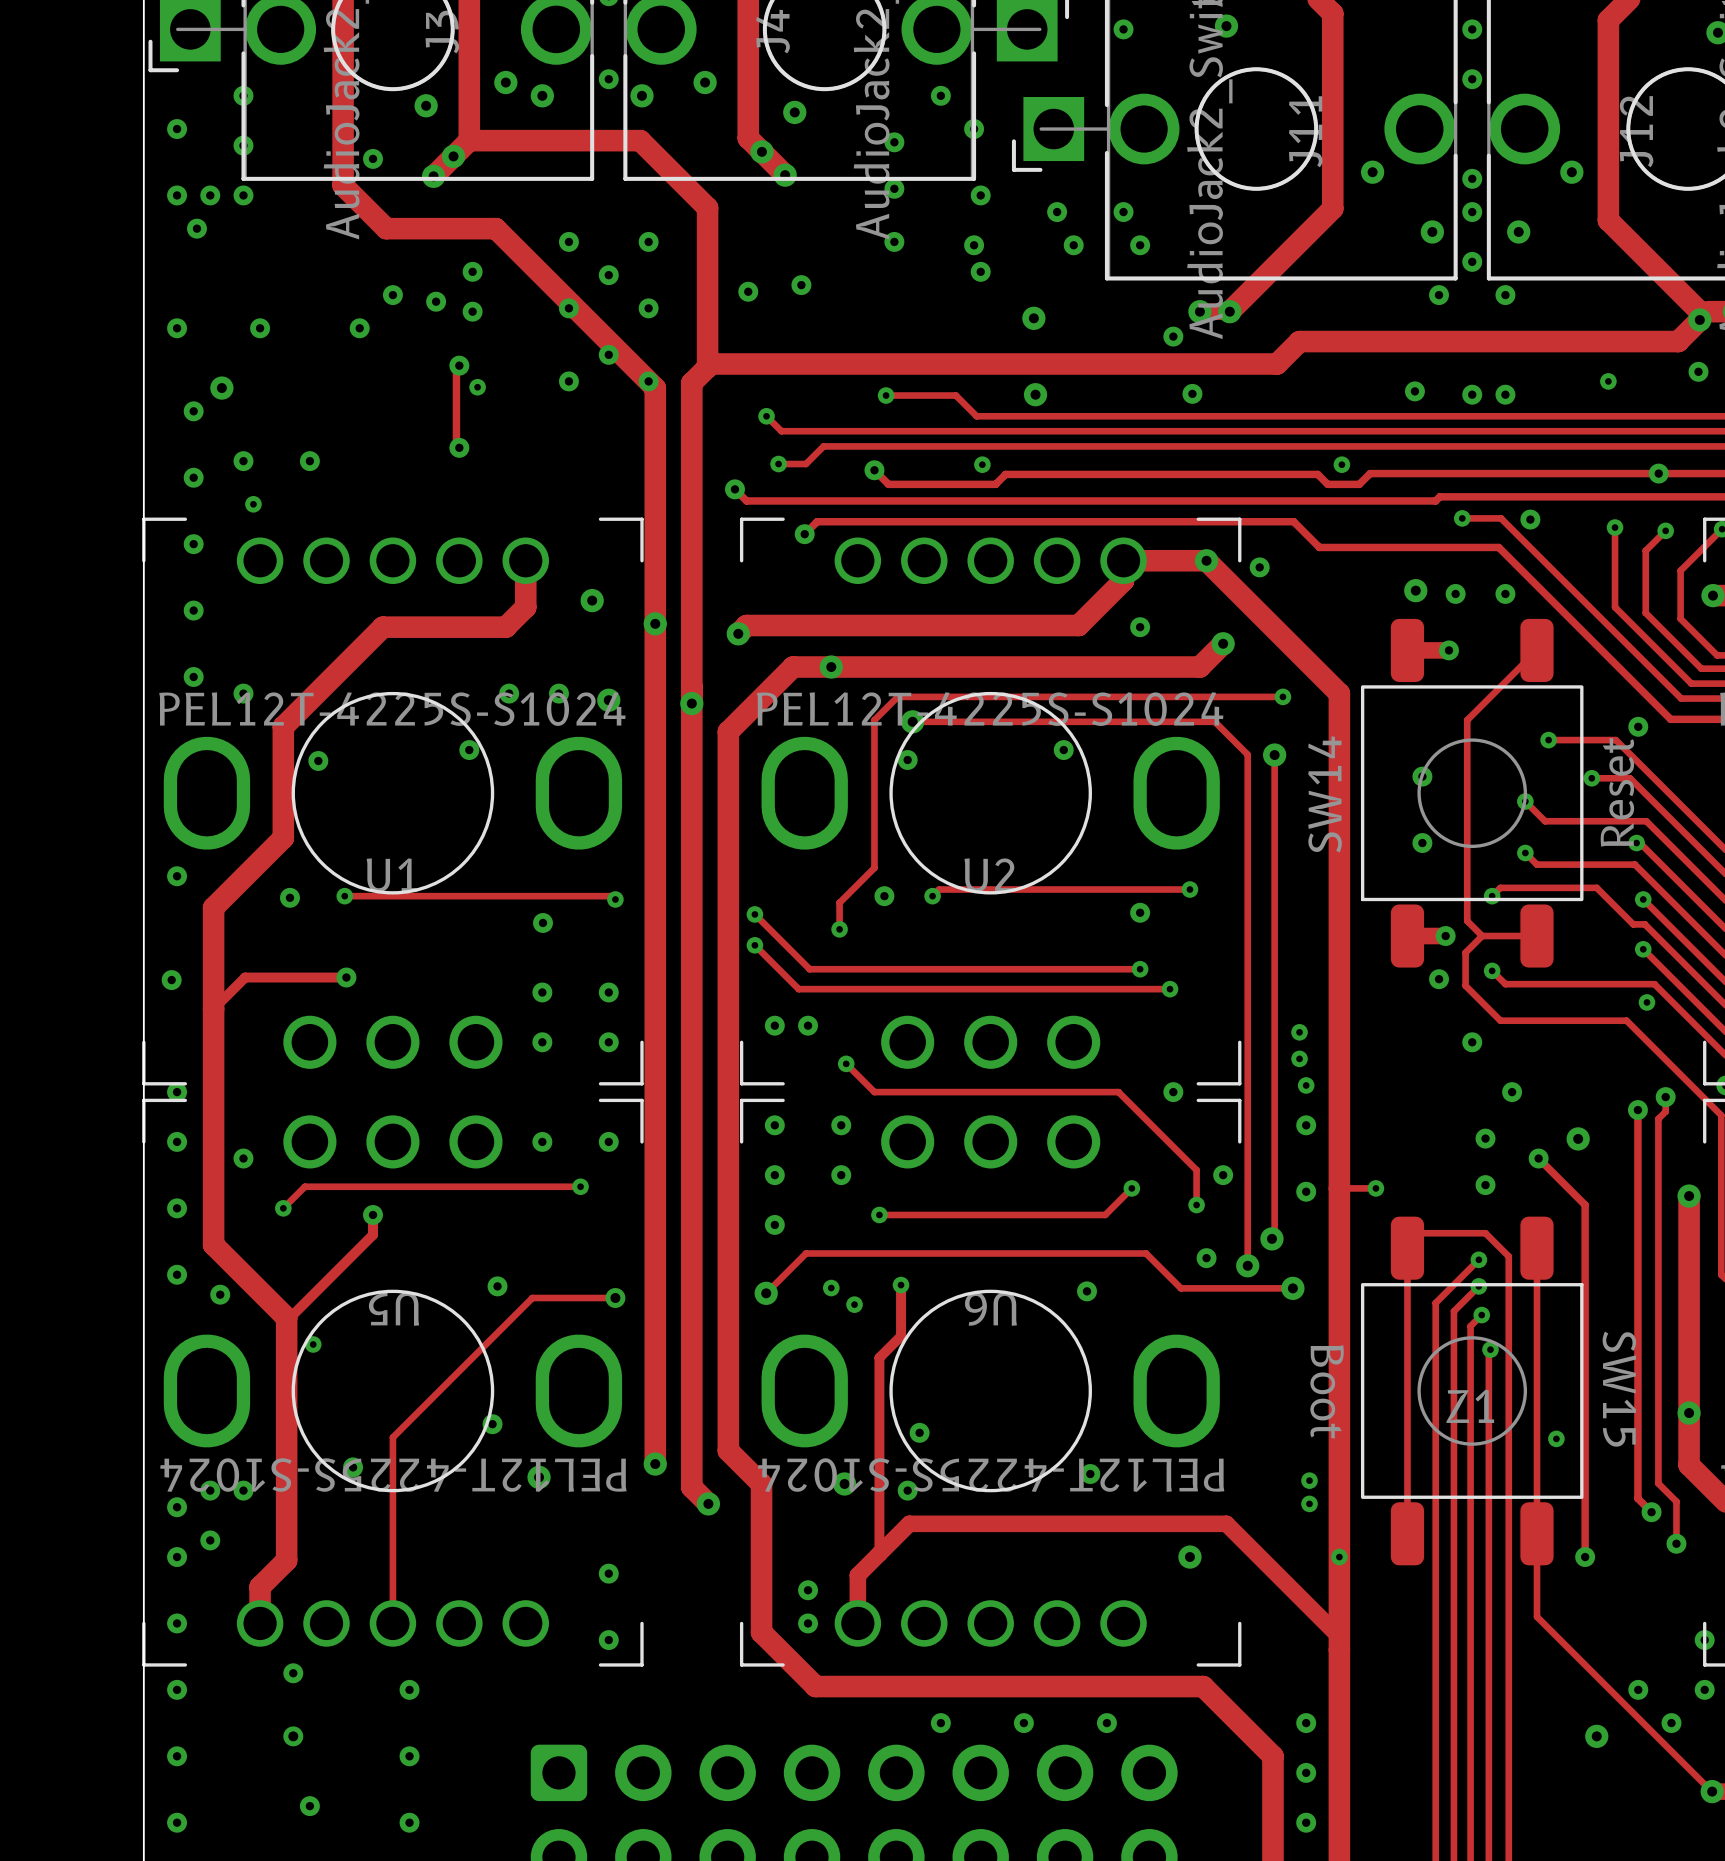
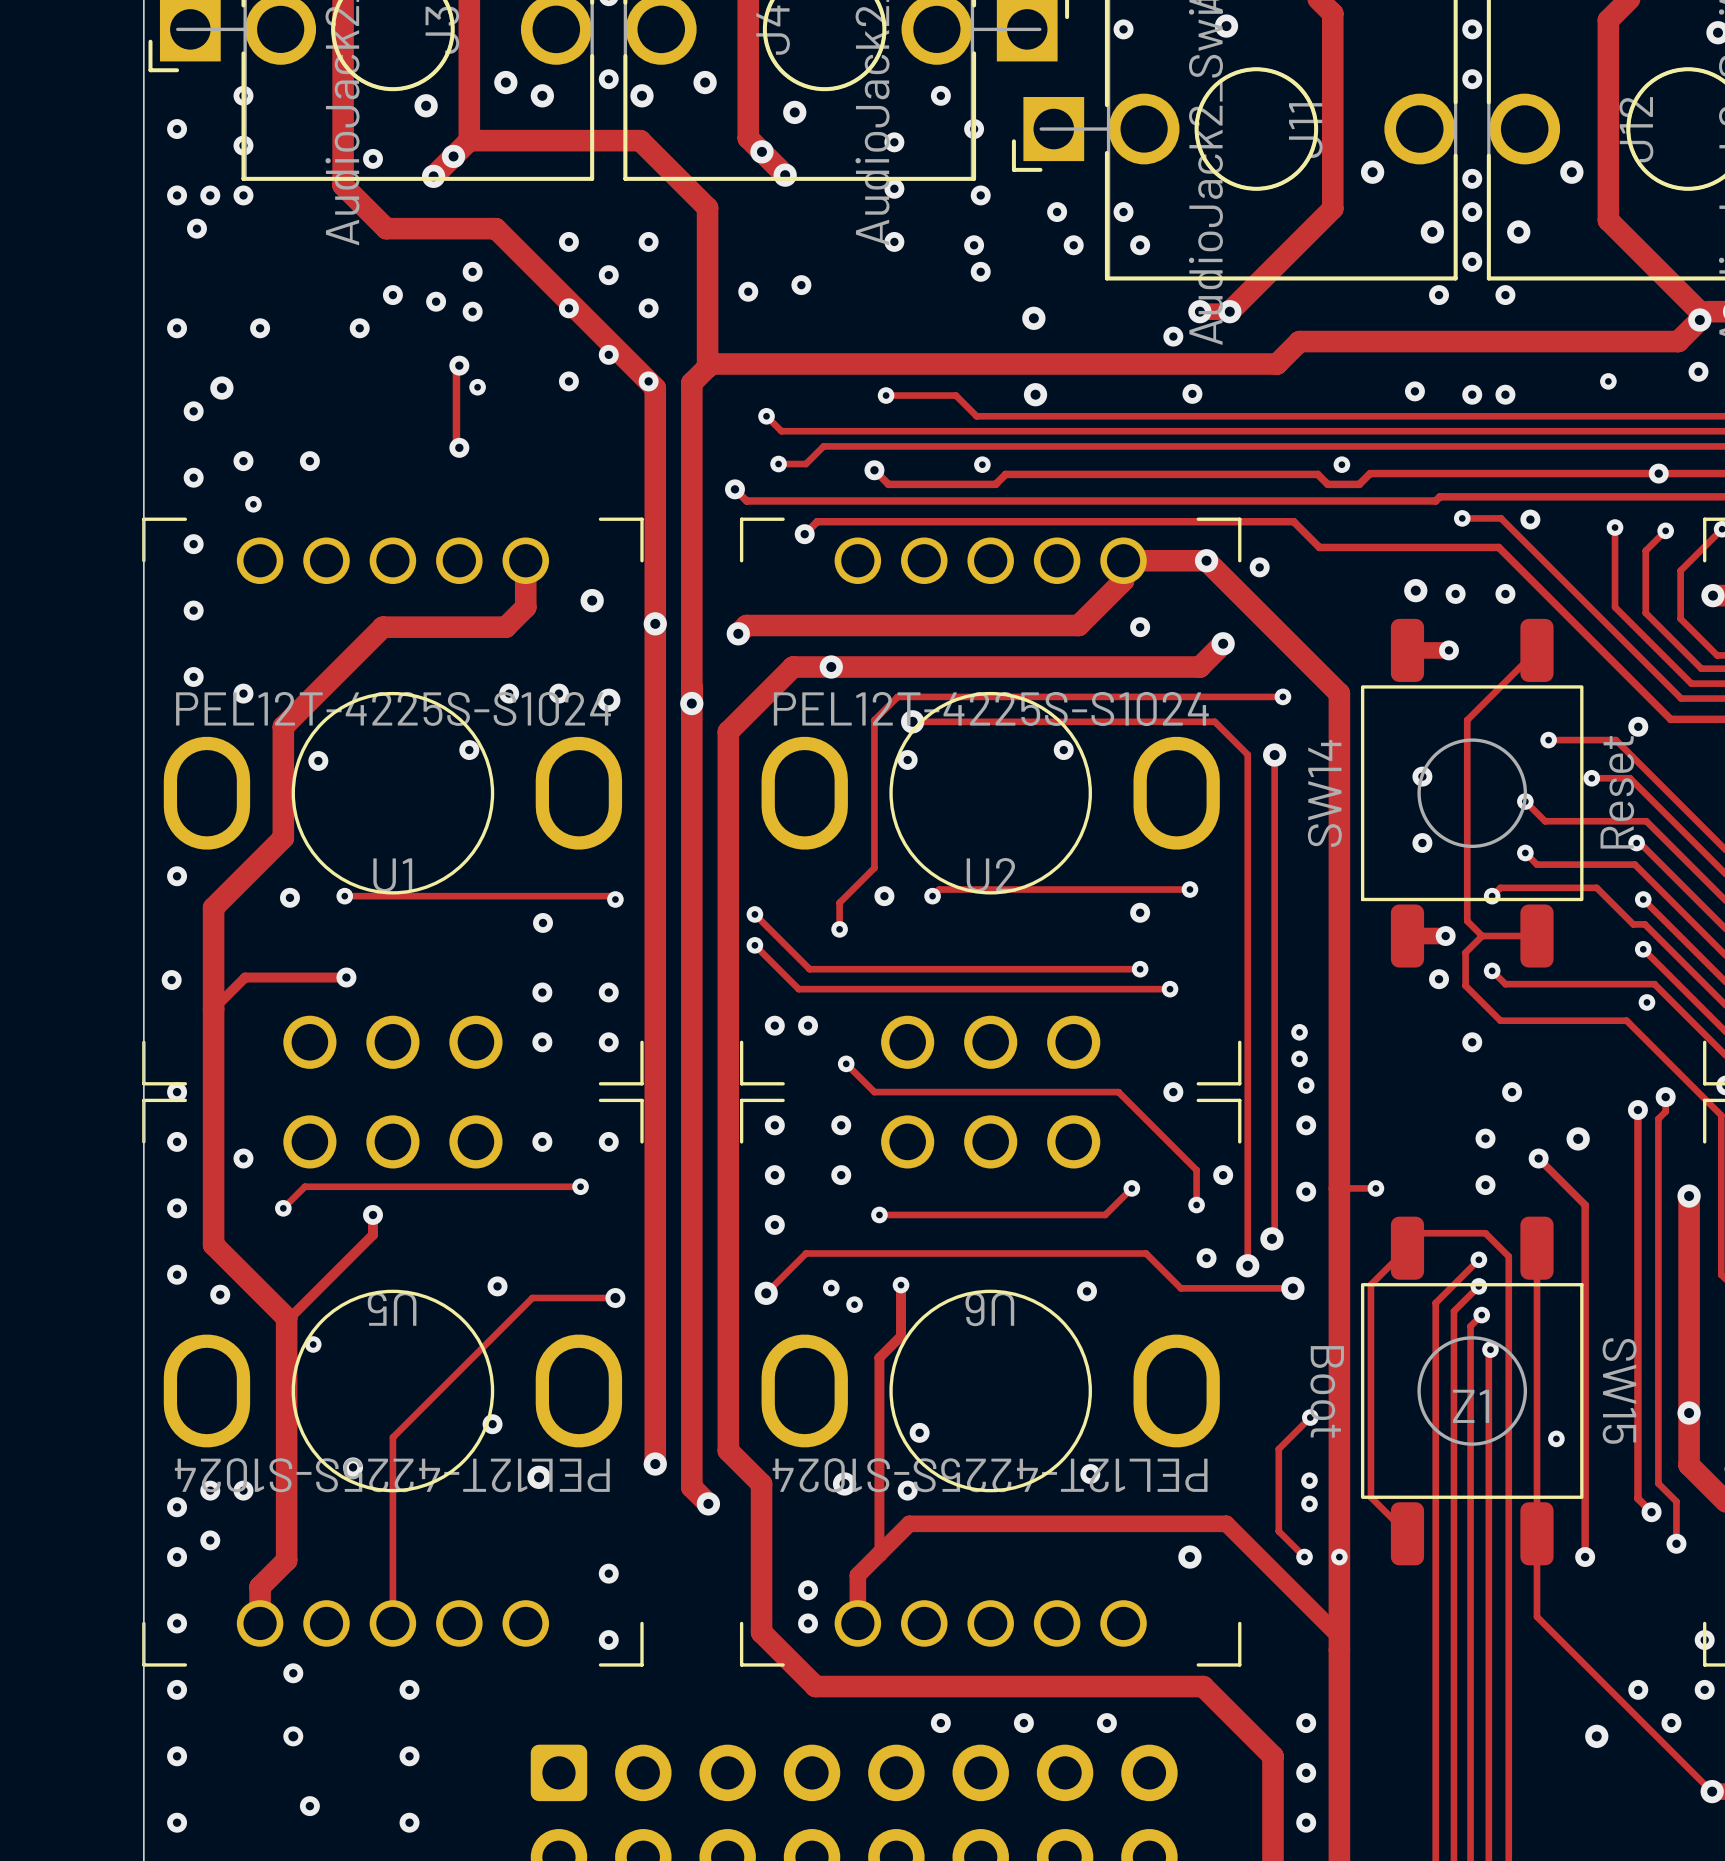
track: (1407, 1248) (1407, 1533) -> (1407, 1248) (1370, 1284) (1370, 1497) (1407, 1533)
track: none -> (1310, 1417) (1278, 1449) (1278, 1531) (1304, 1557)
via: none -> (1310, 1417)
via: none -> (1304, 1557)

